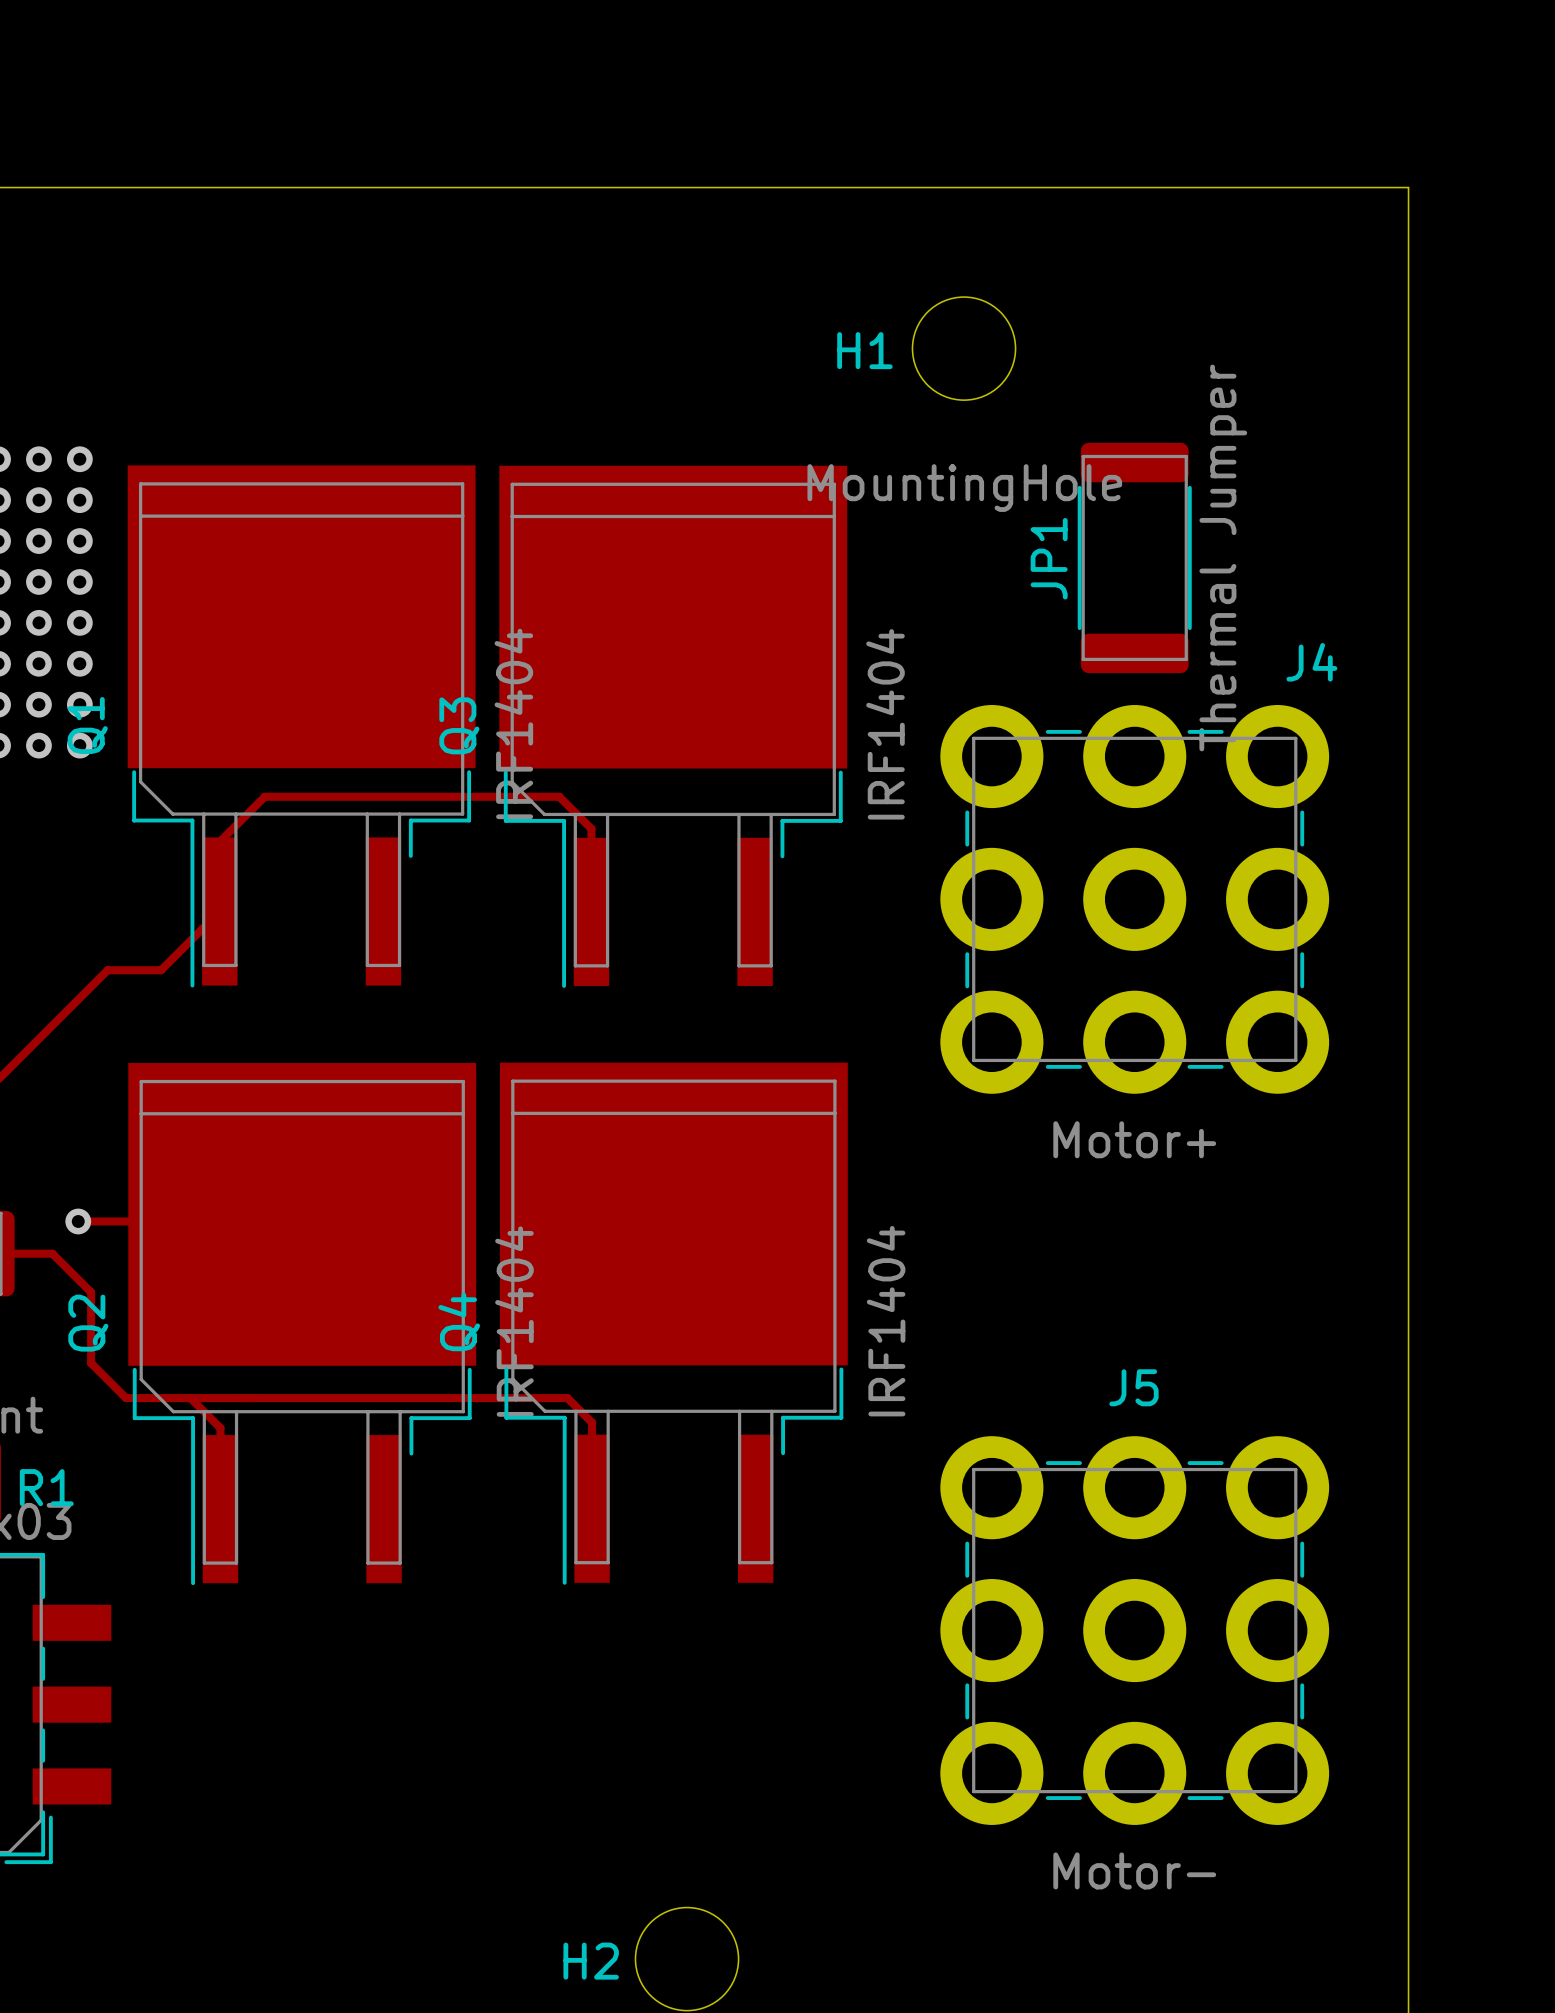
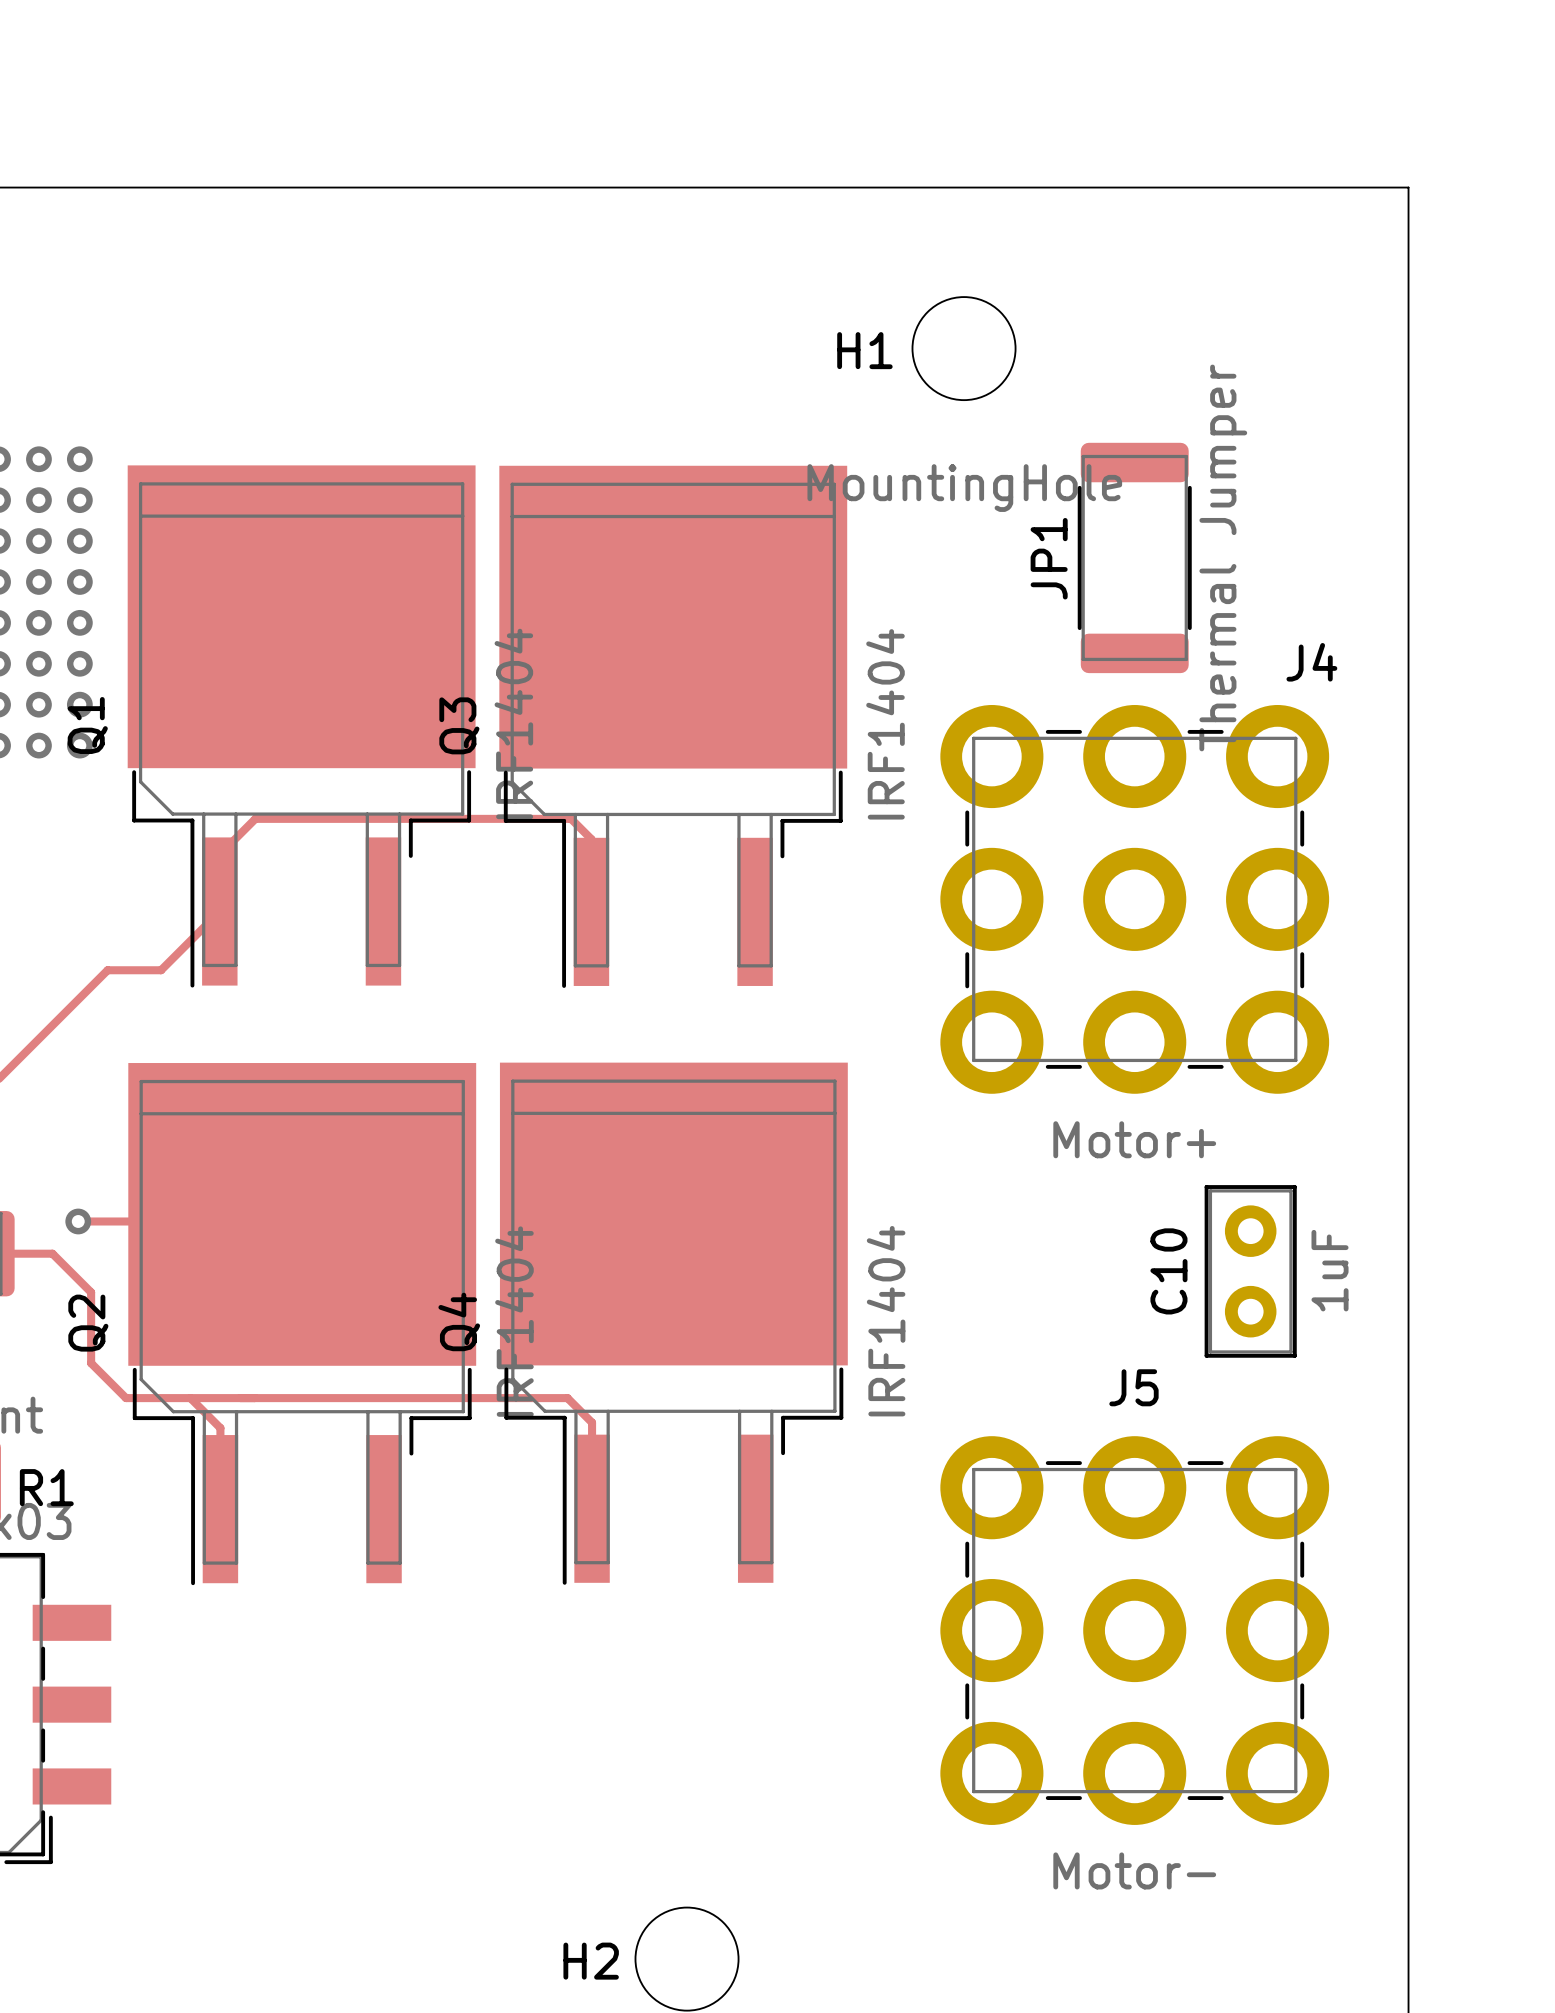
track: (591, 839) (591, 828) (559, 796) (264, 796) (219, 841) -> (591, 839) (571, 818) (255, 818) (219, 854) (219, 911)
C10: none -> 1uF (1250, 1271)

